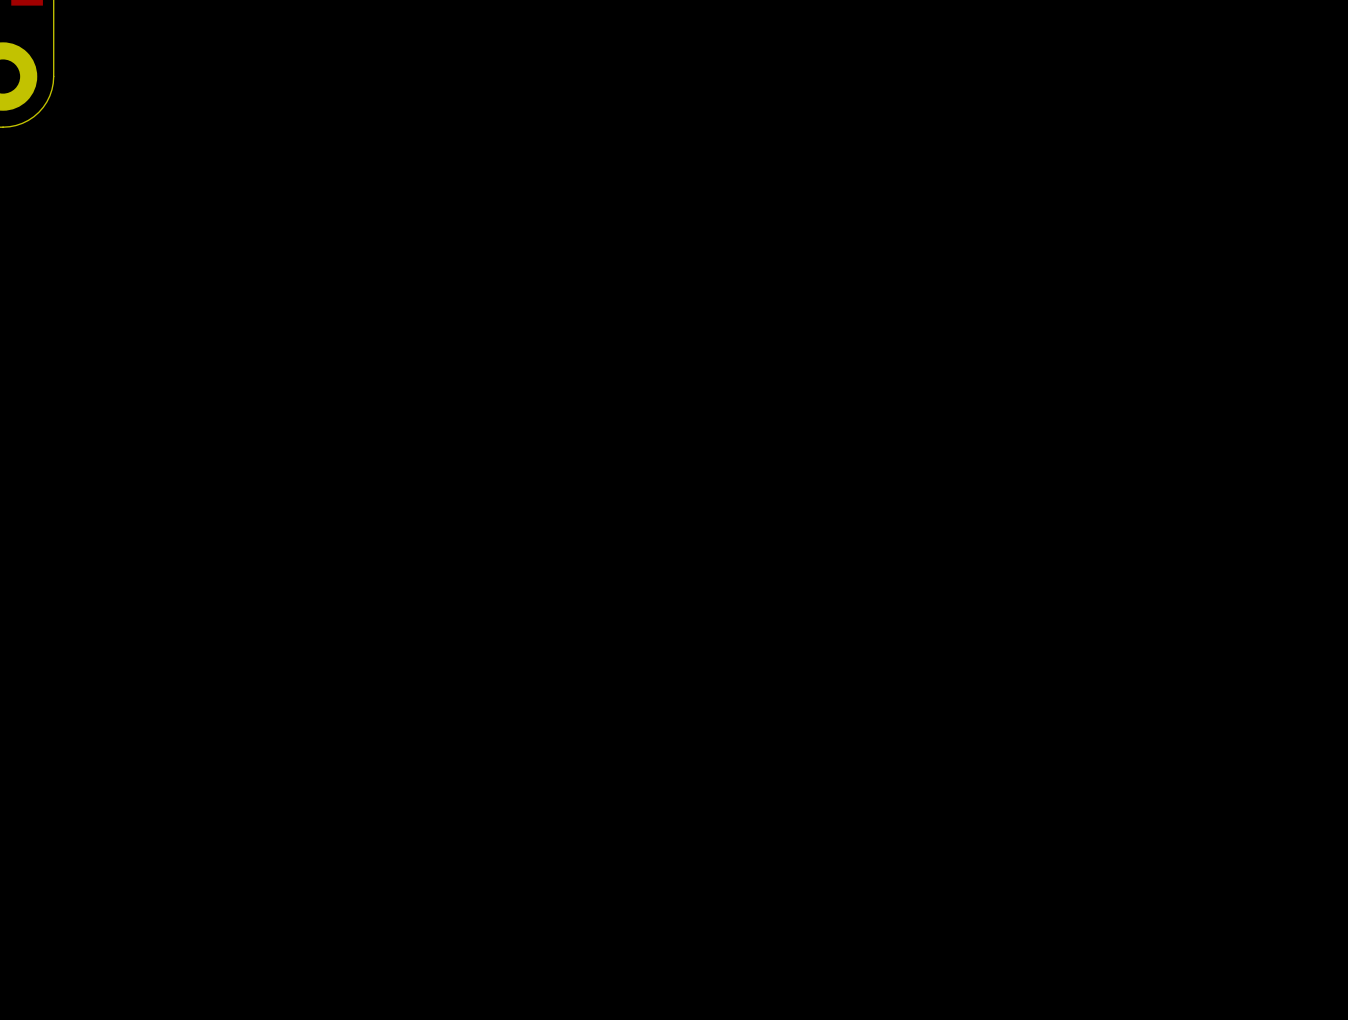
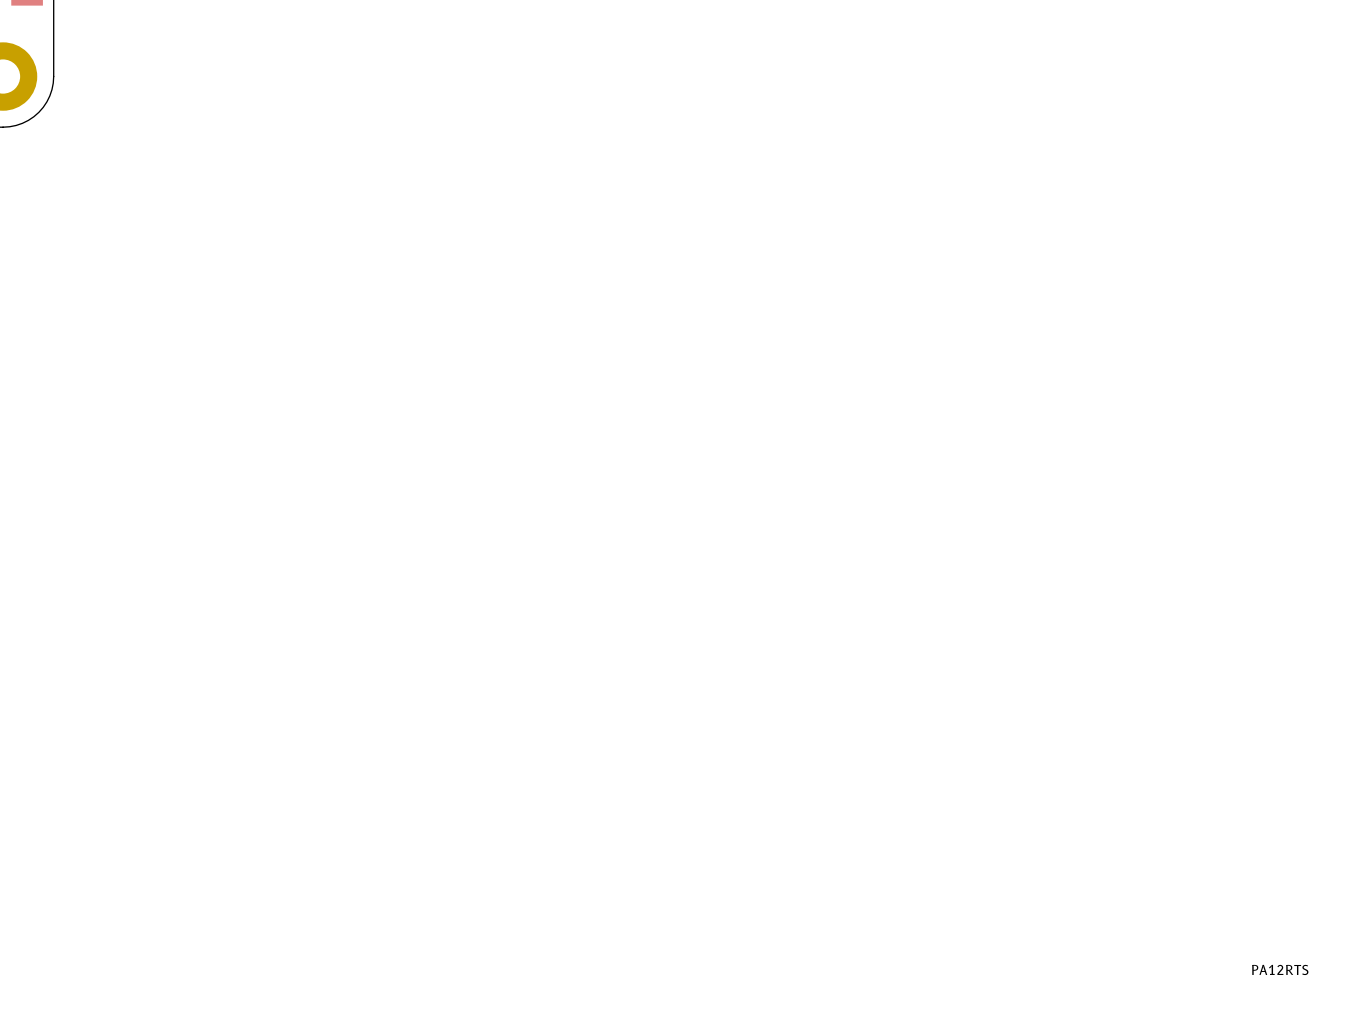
drawing: none -> [1252, 964, 1309, 976]

